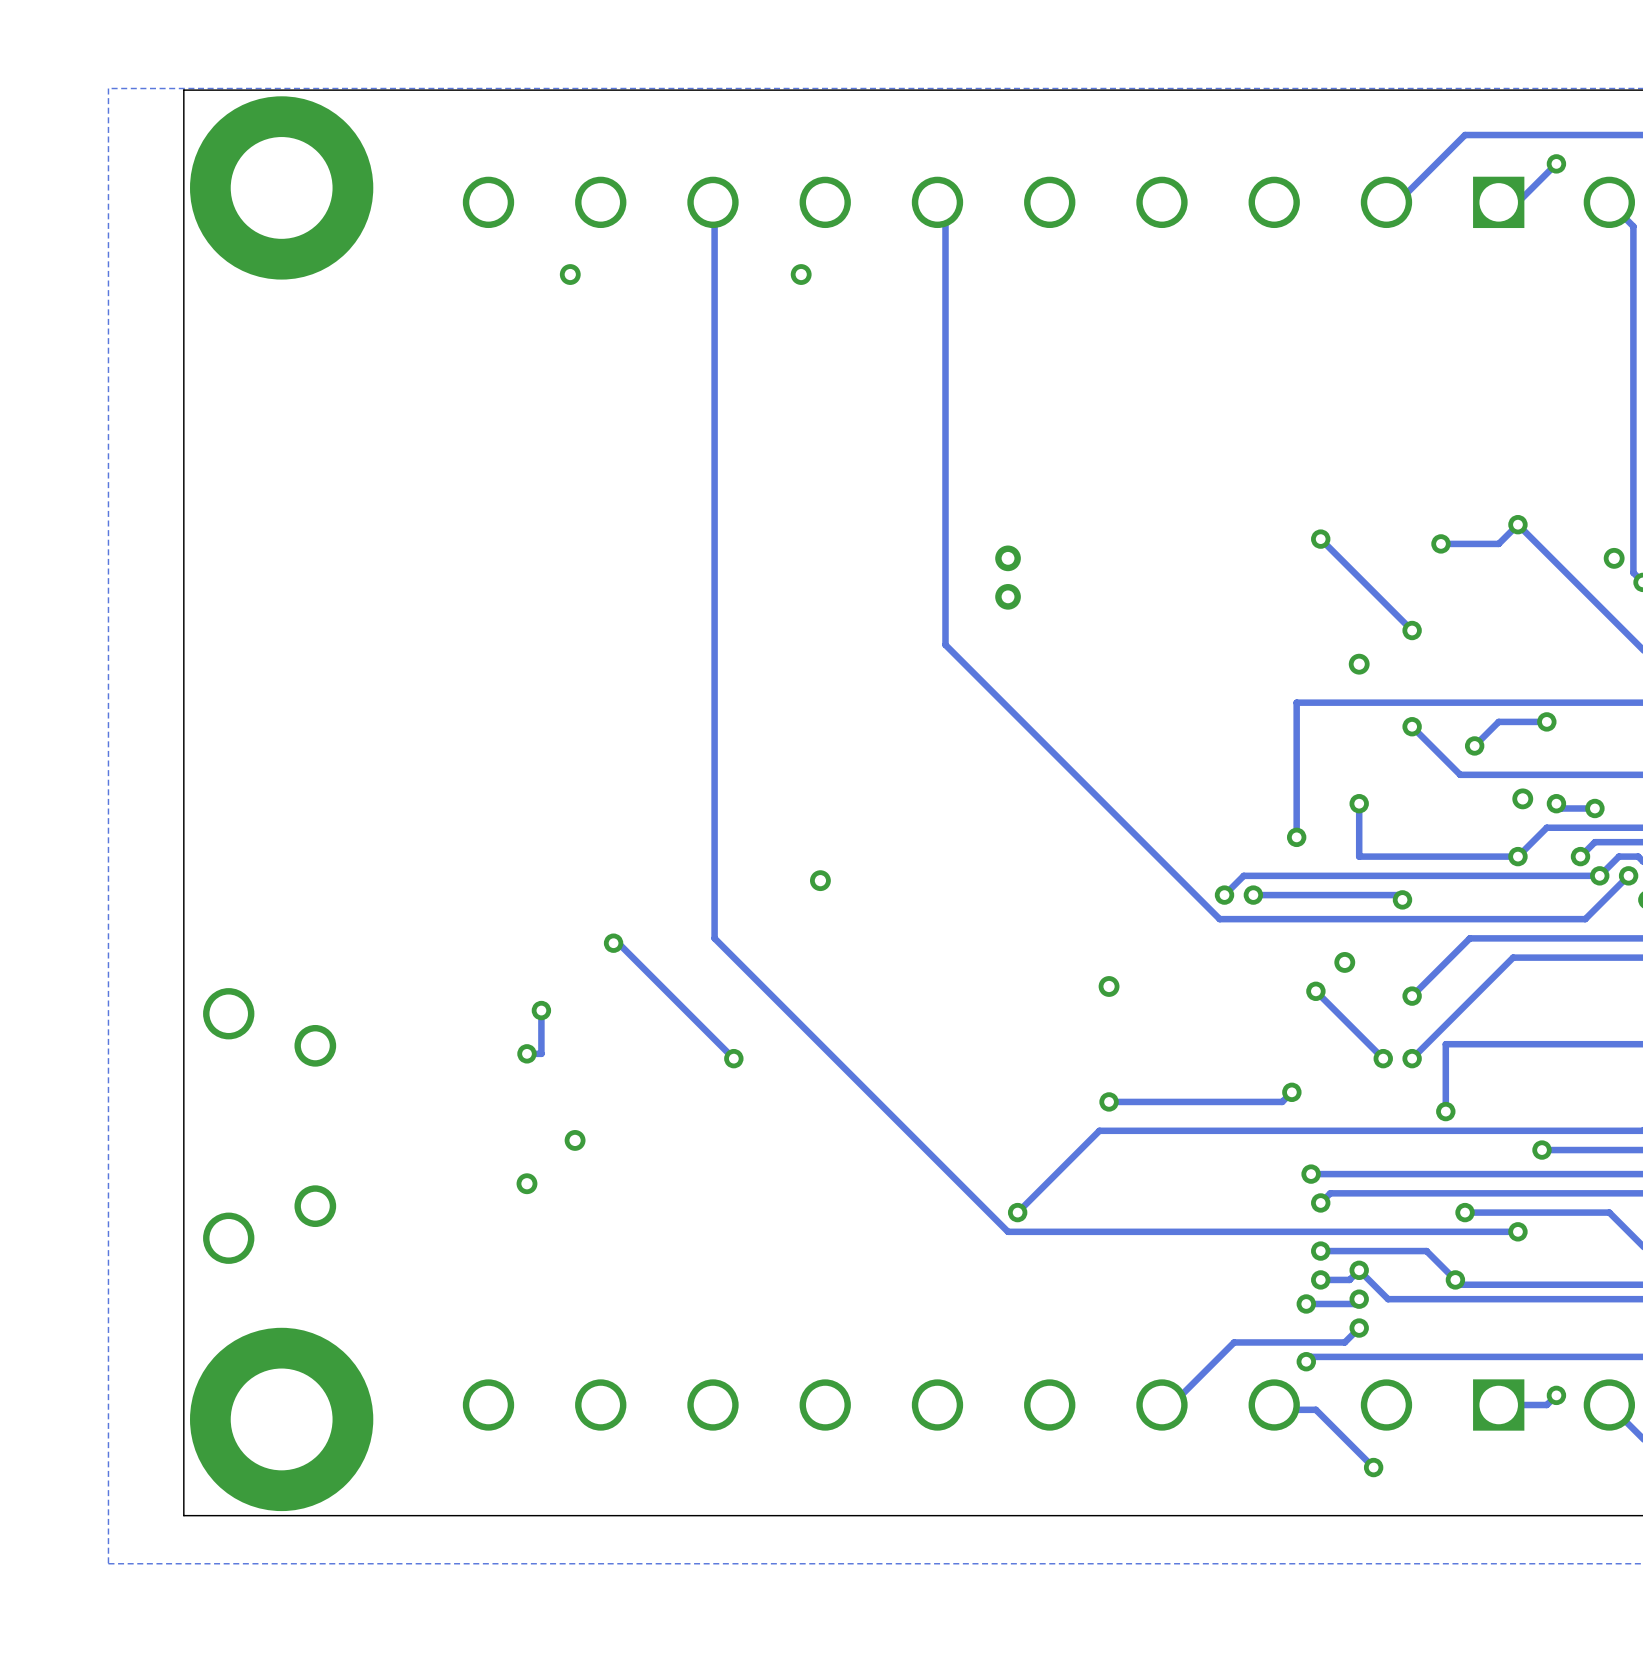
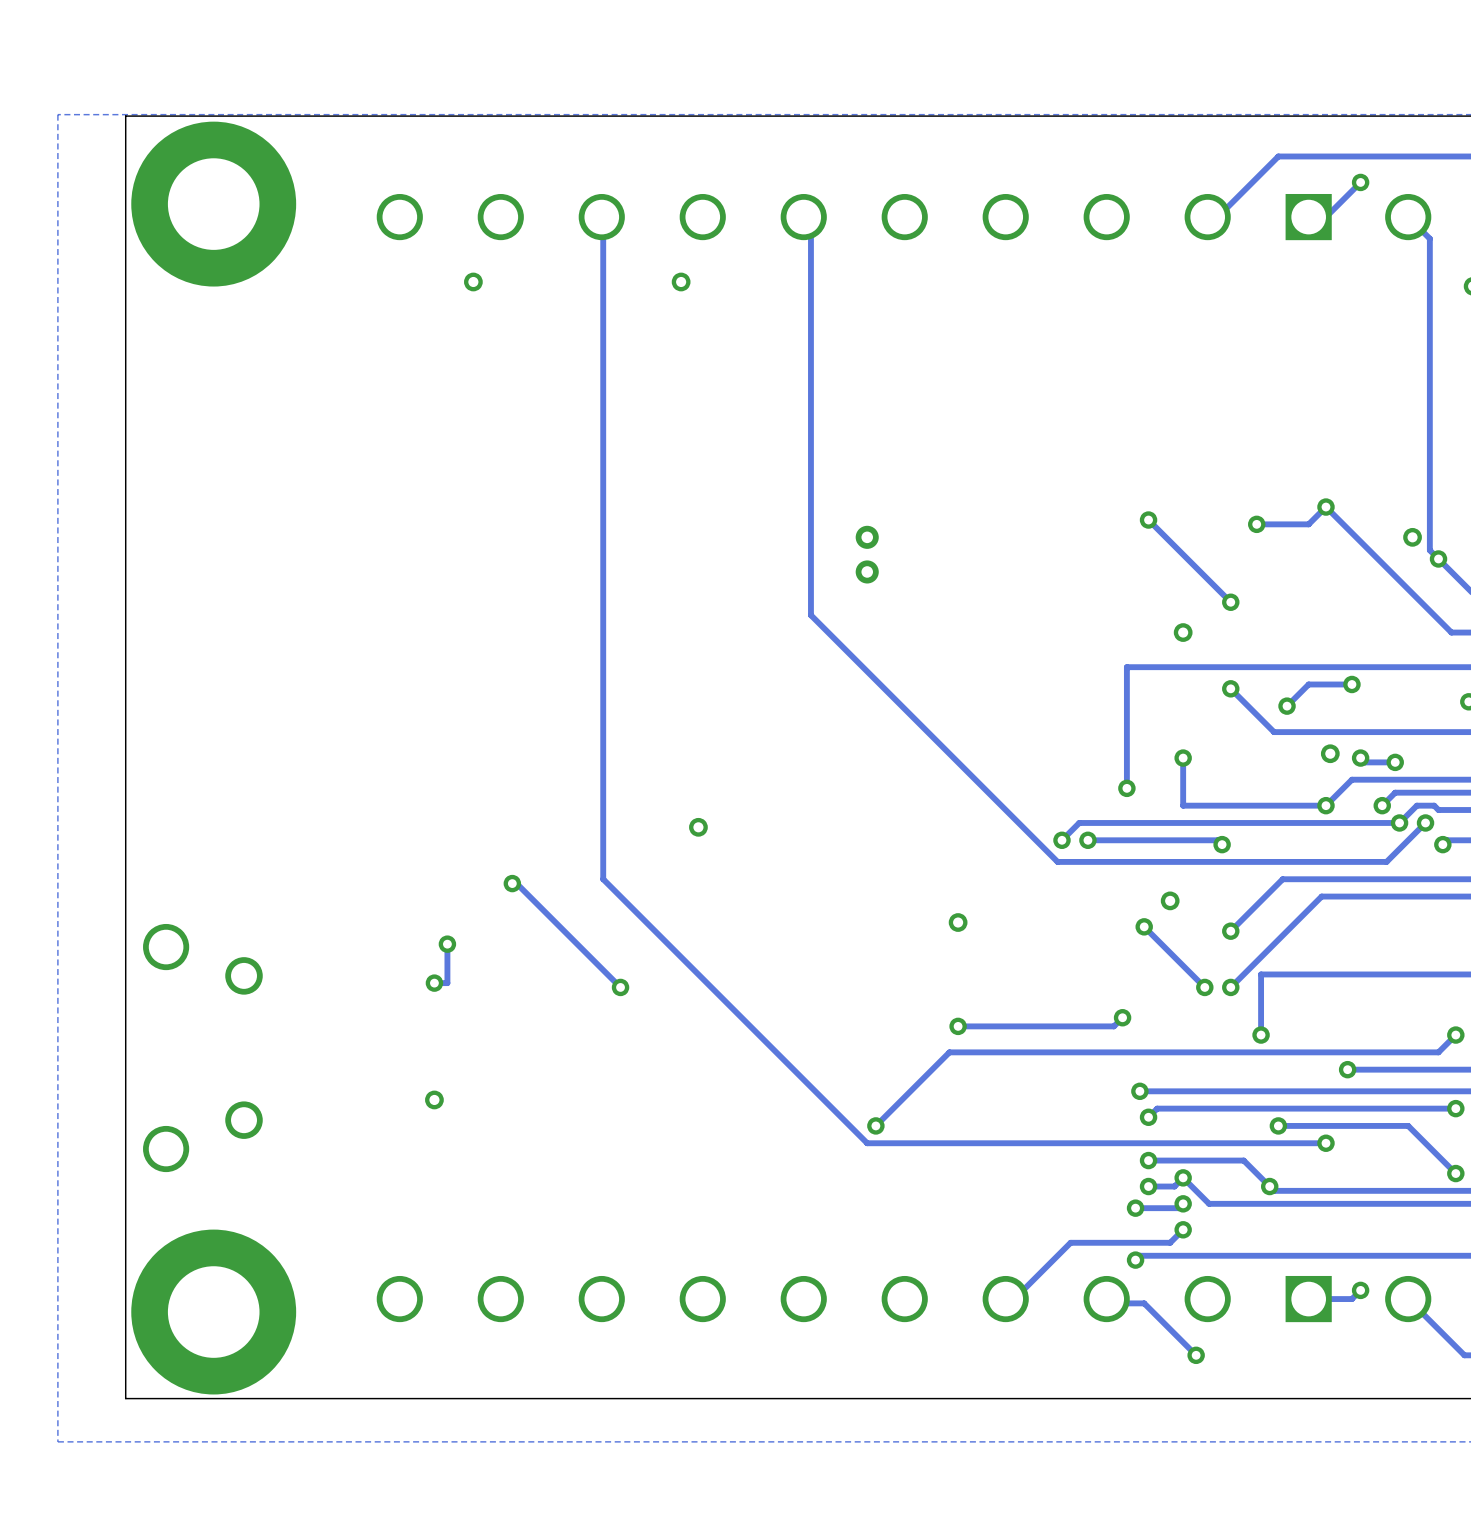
via: (575, 1140) -> none

